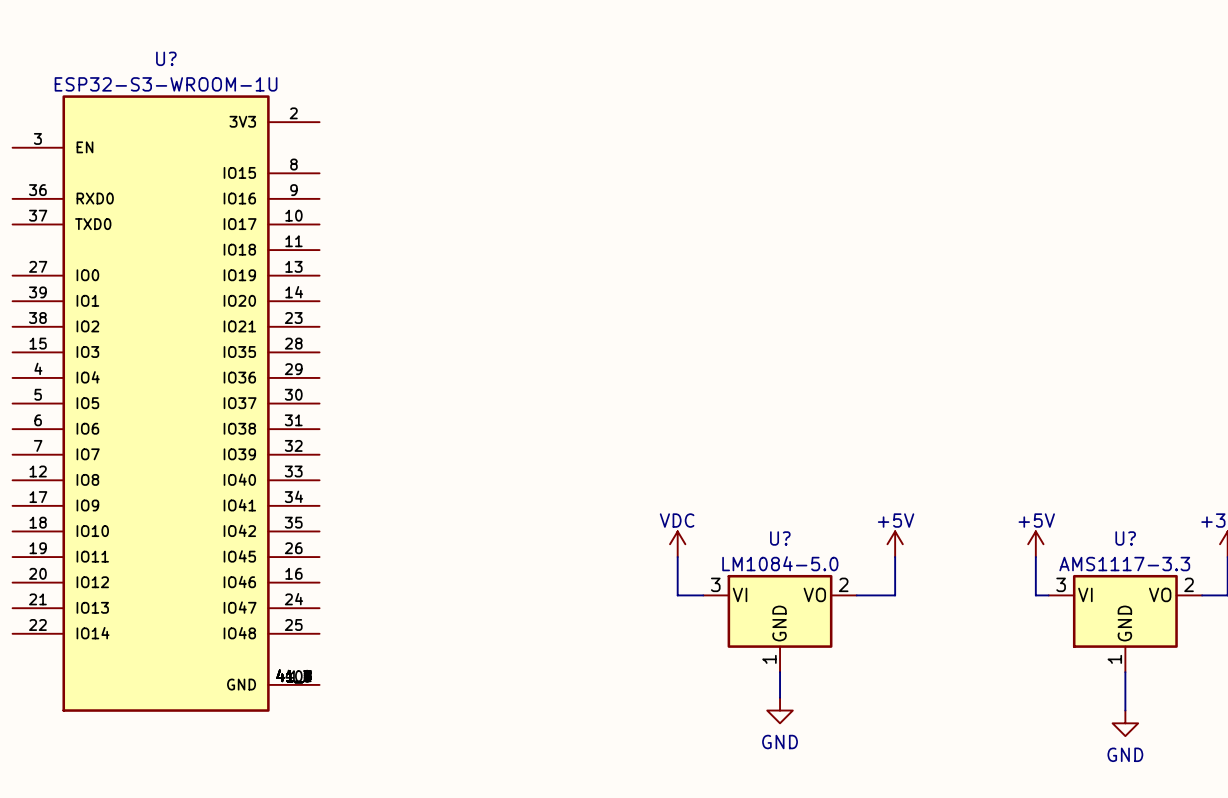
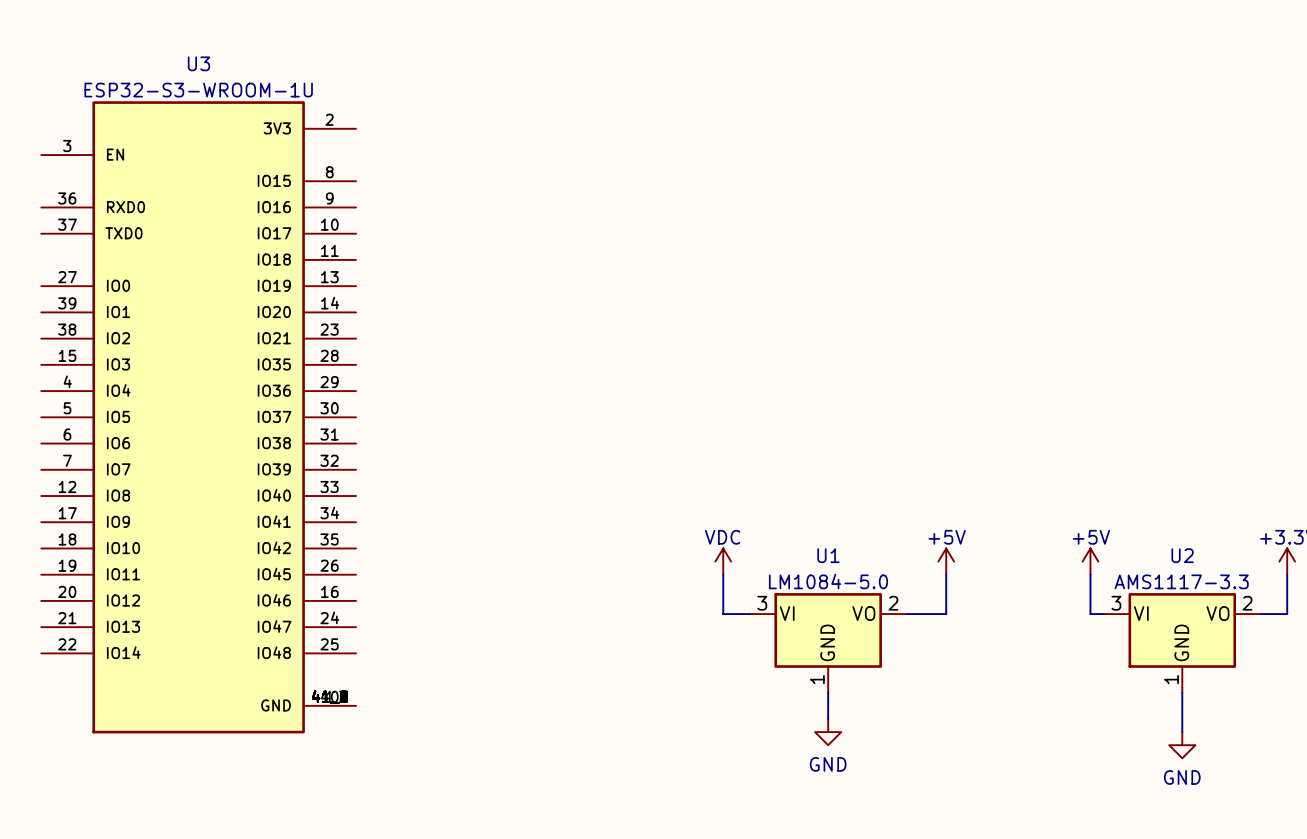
U? name: U? (166, 58) -> U3 (198, 63)
U? name: U? (780, 538) -> U1 (828, 555)
U? name: U? (1125, 538) -> U2 (1182, 555)

